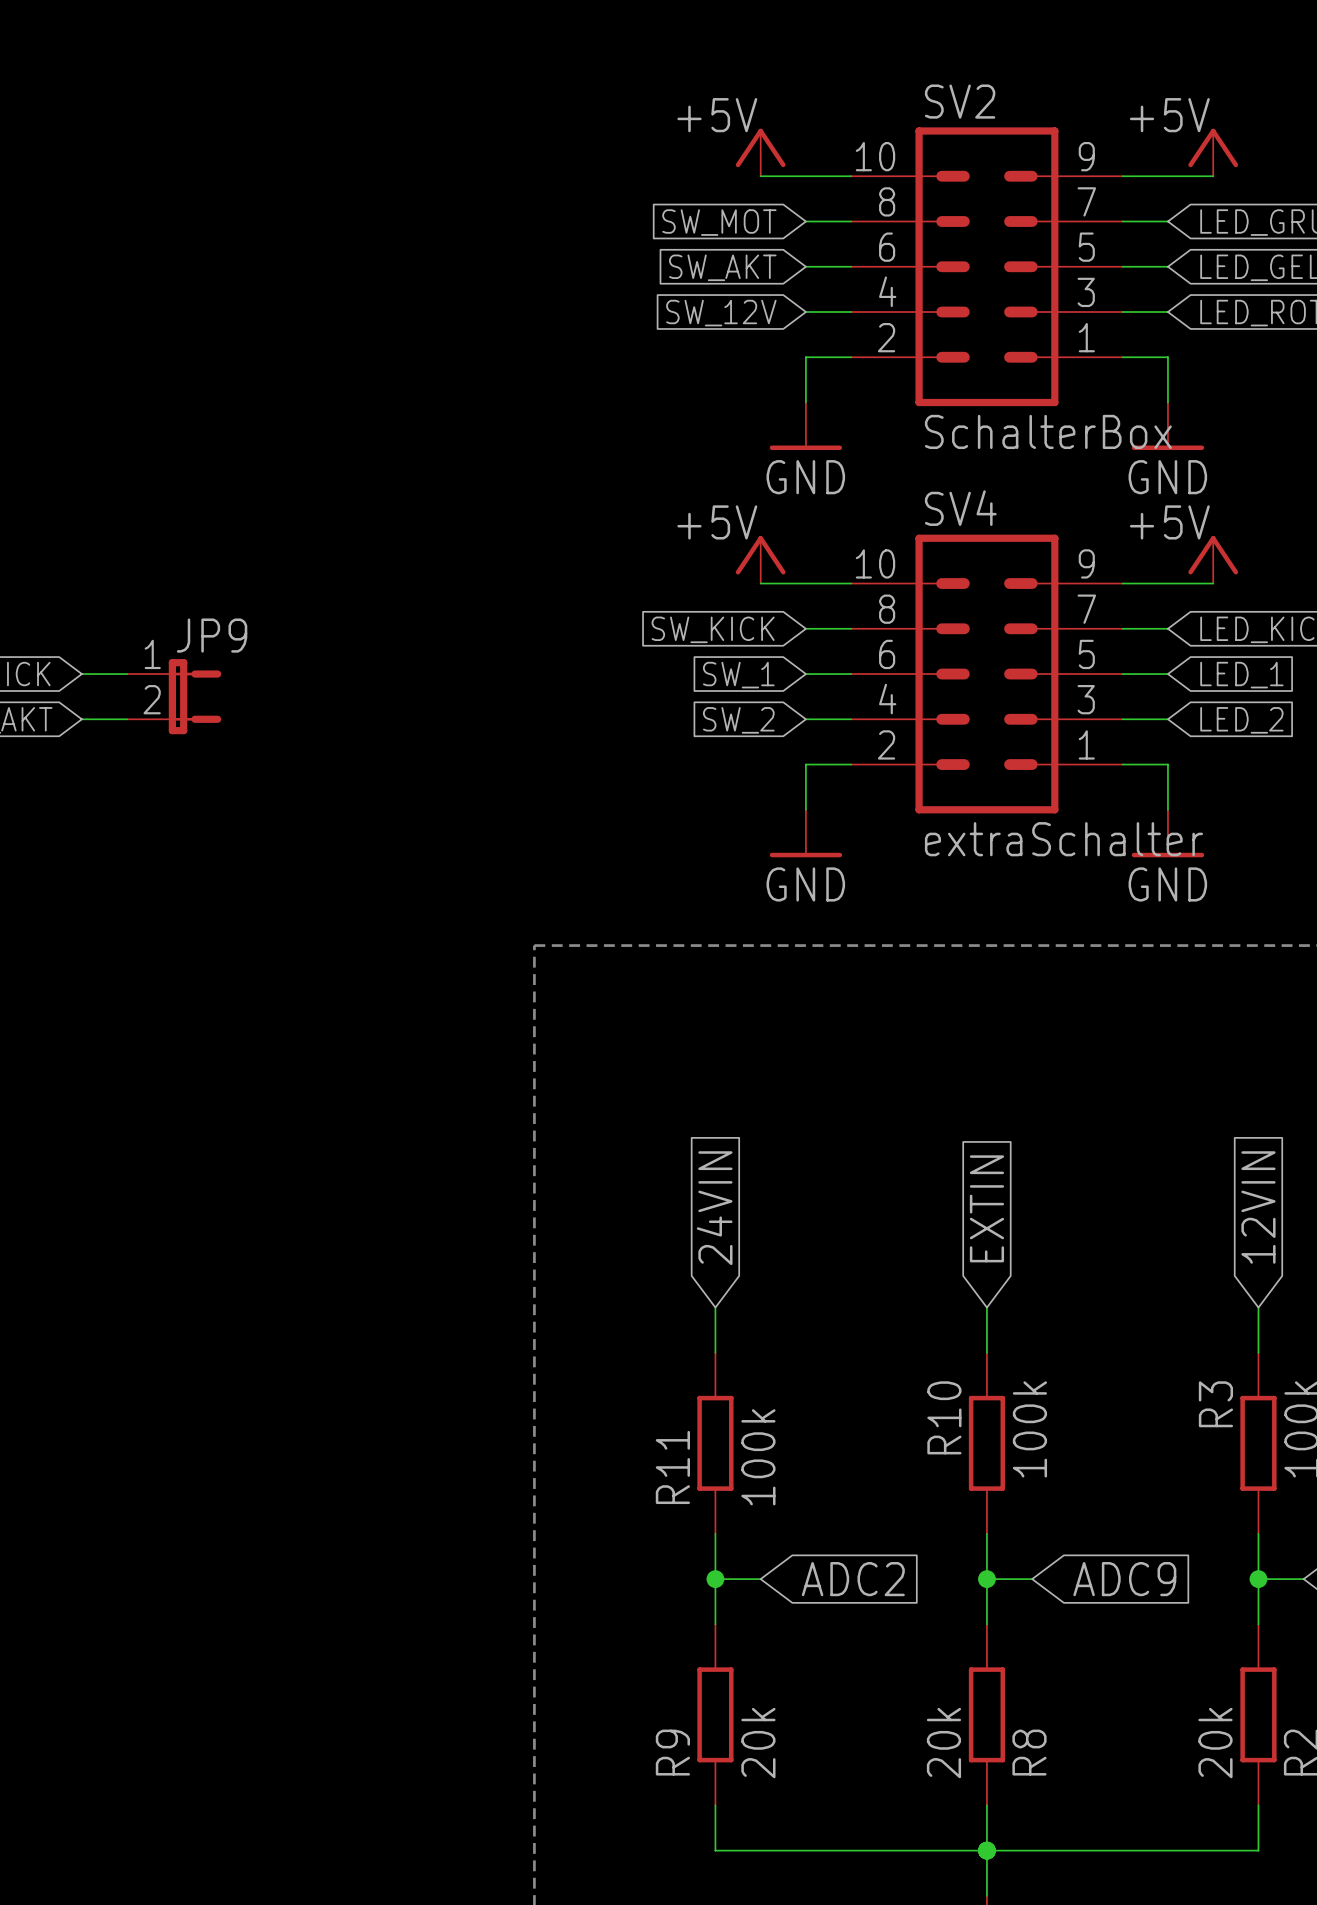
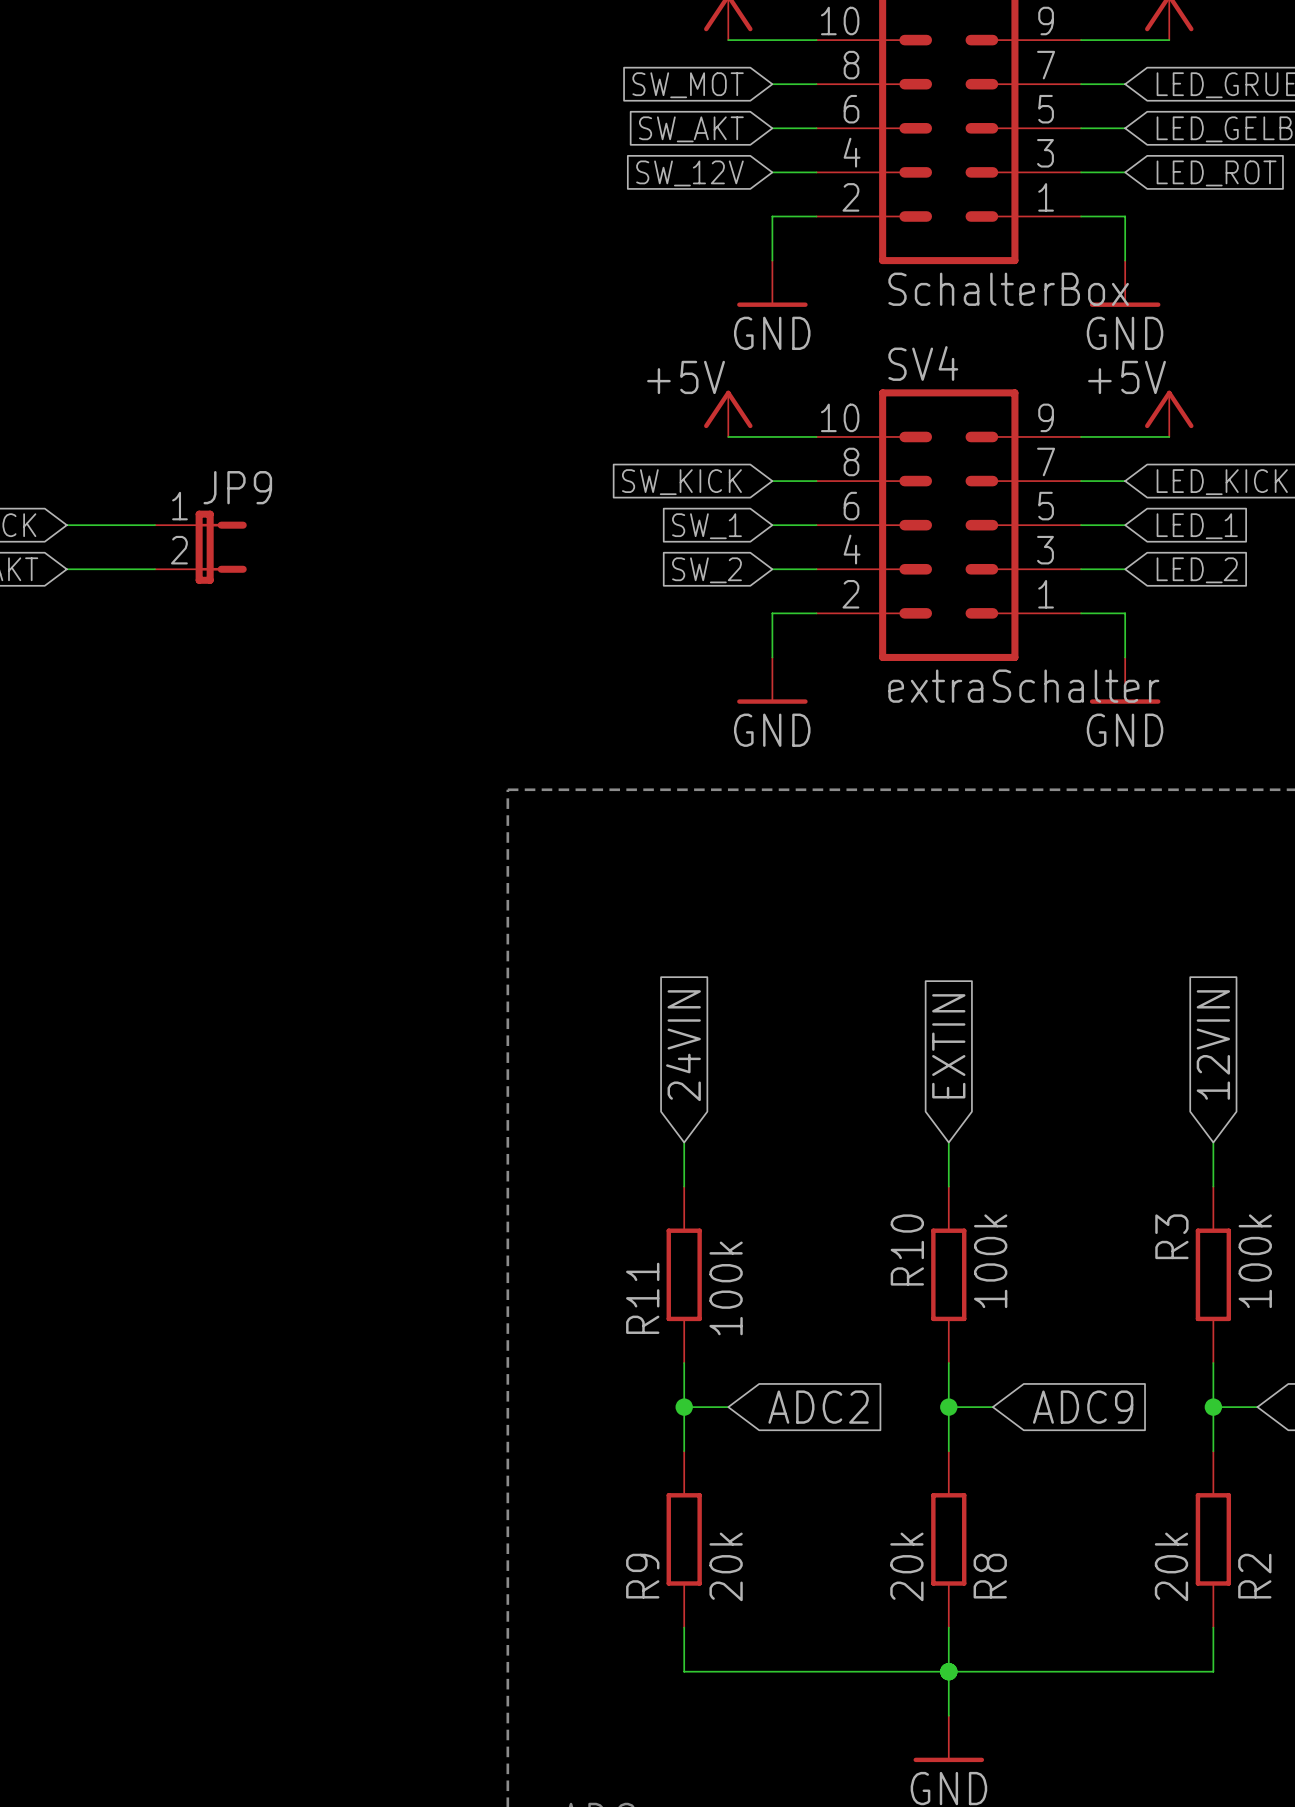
JP9 position: (174, 696) -> (200, 547)

